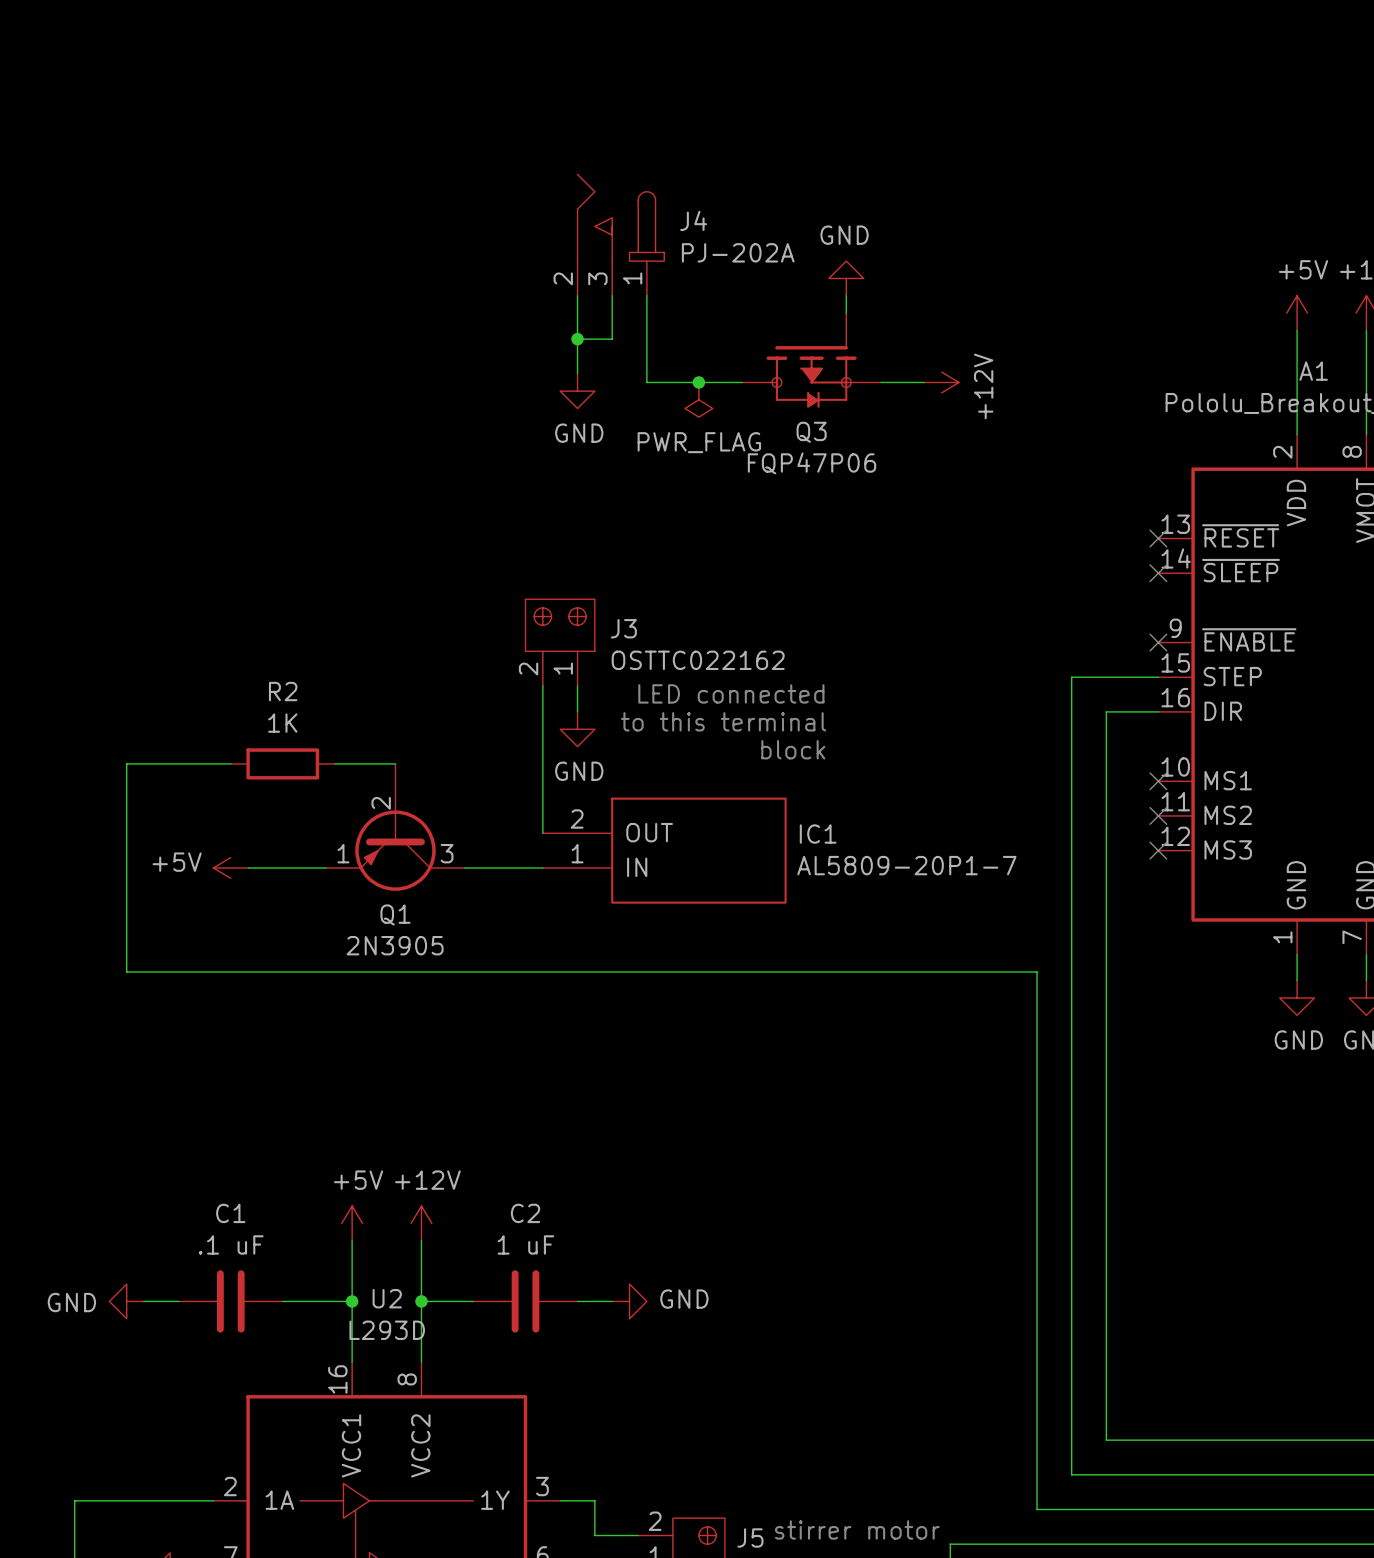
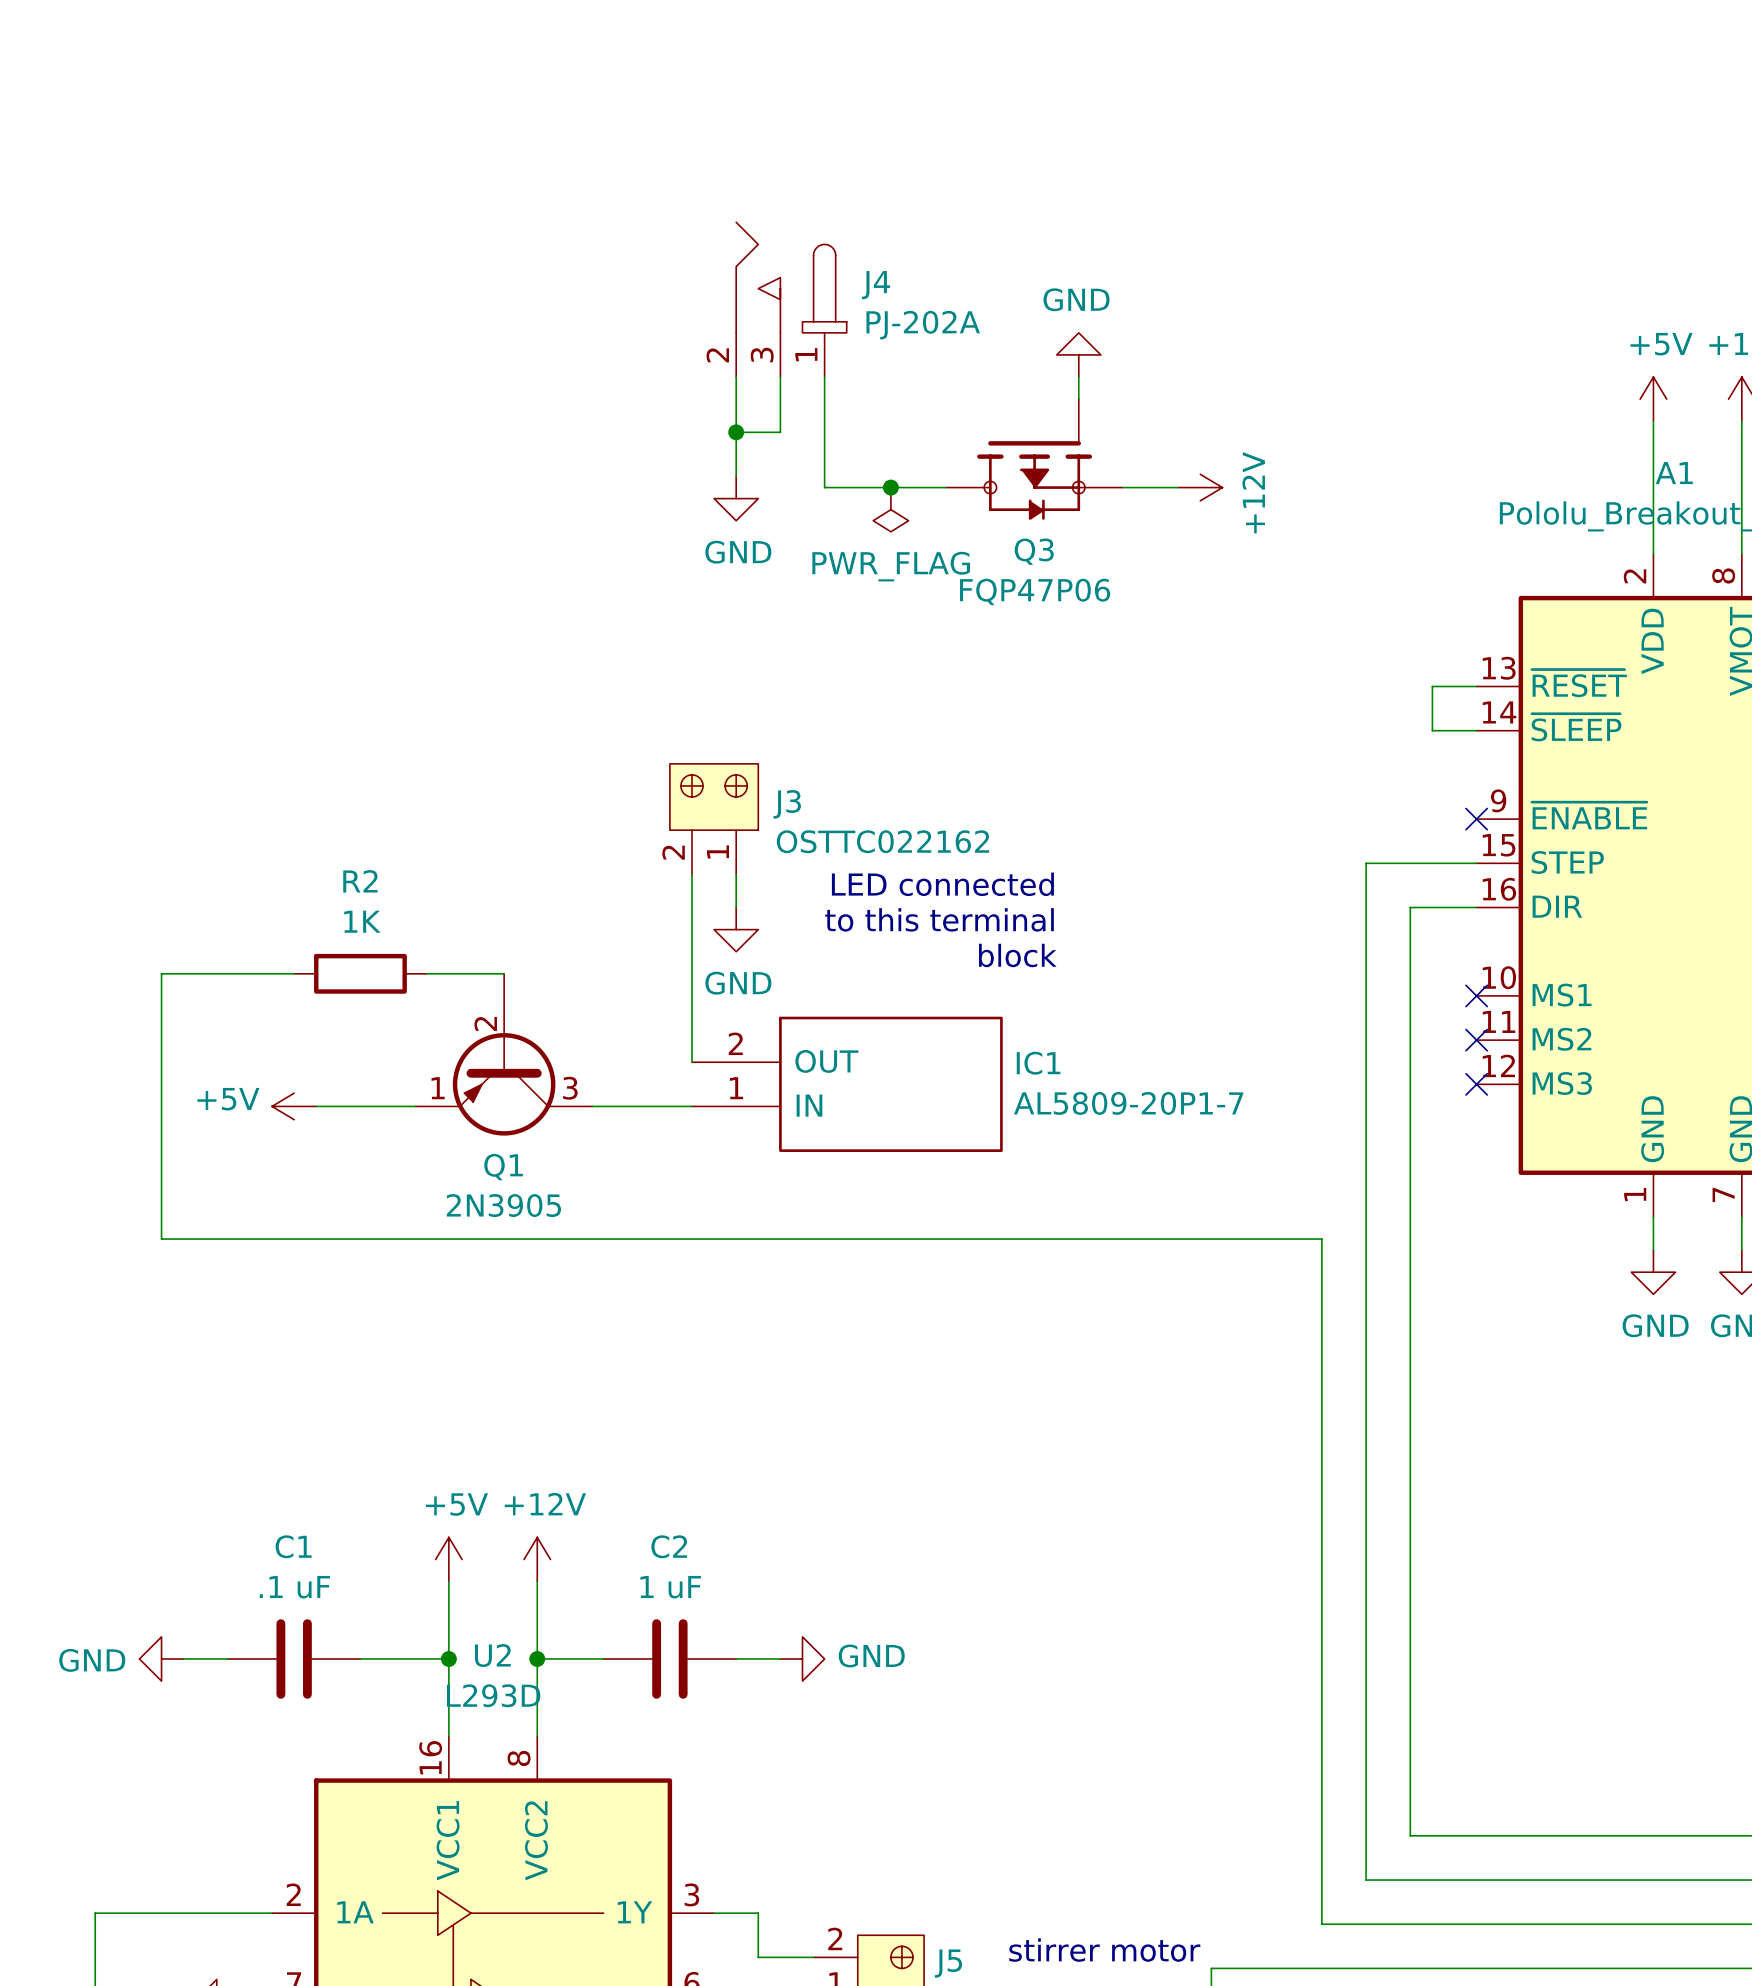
wire: none -> (1476, 686) (1432, 686) (1432, 730) (1476, 730)
no-connect mark: (1158, 538) -> none
no-connect mark: (1158, 573) -> none

